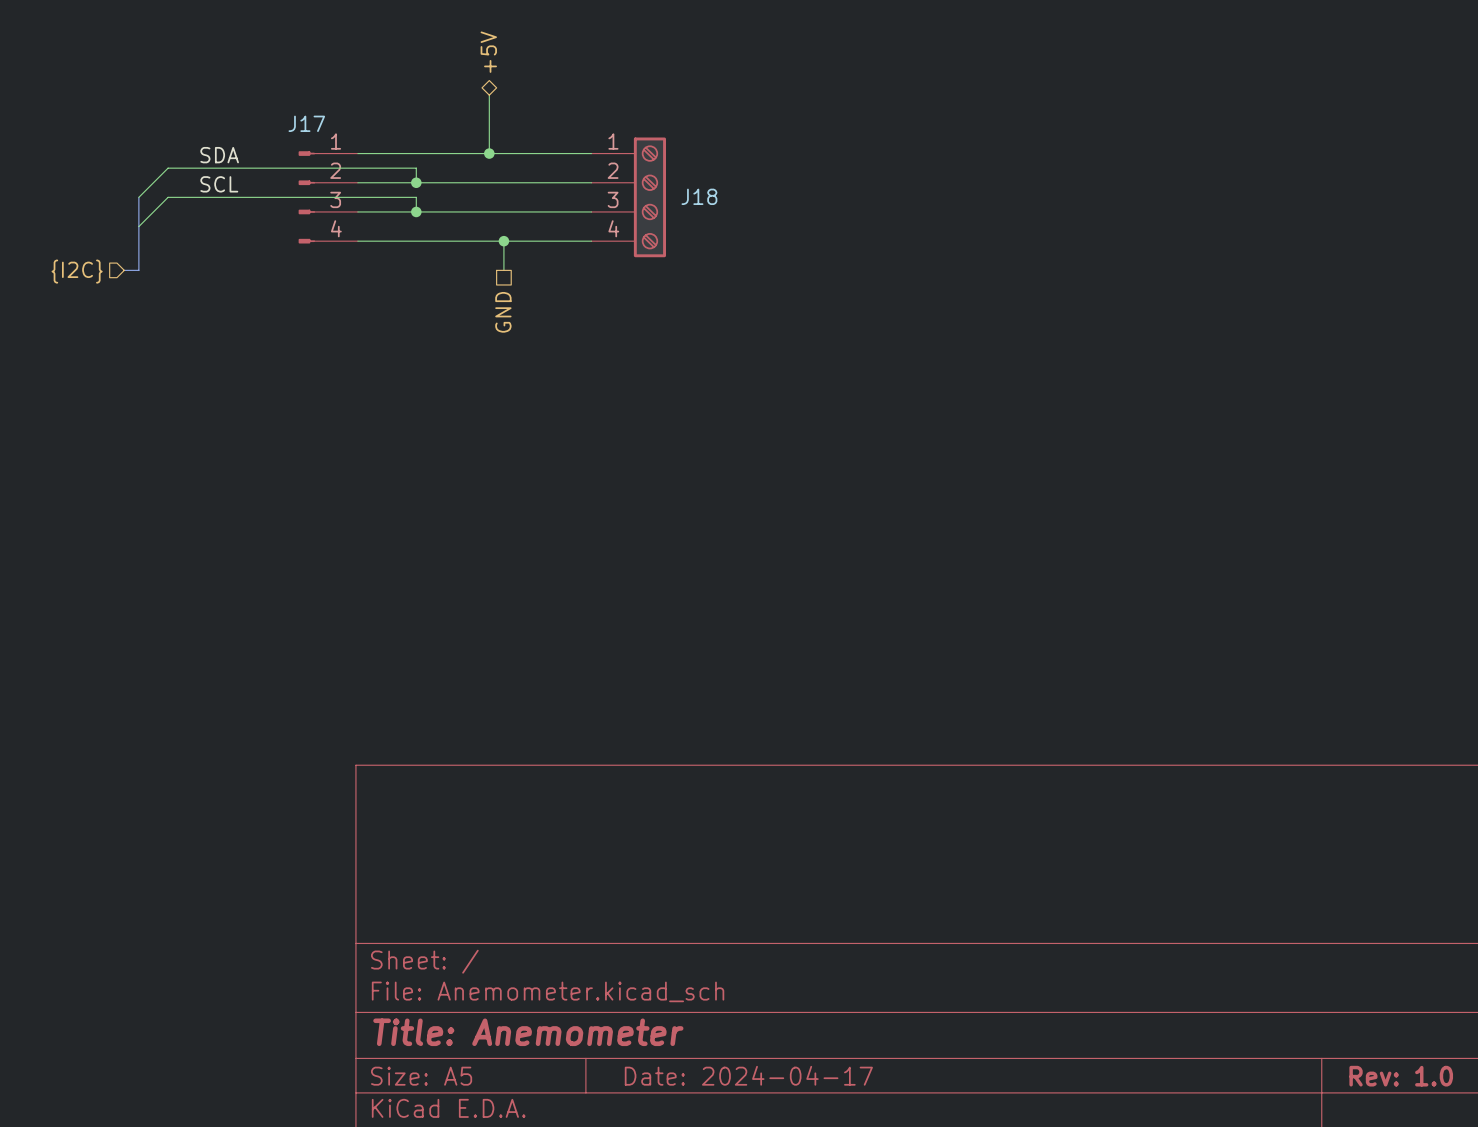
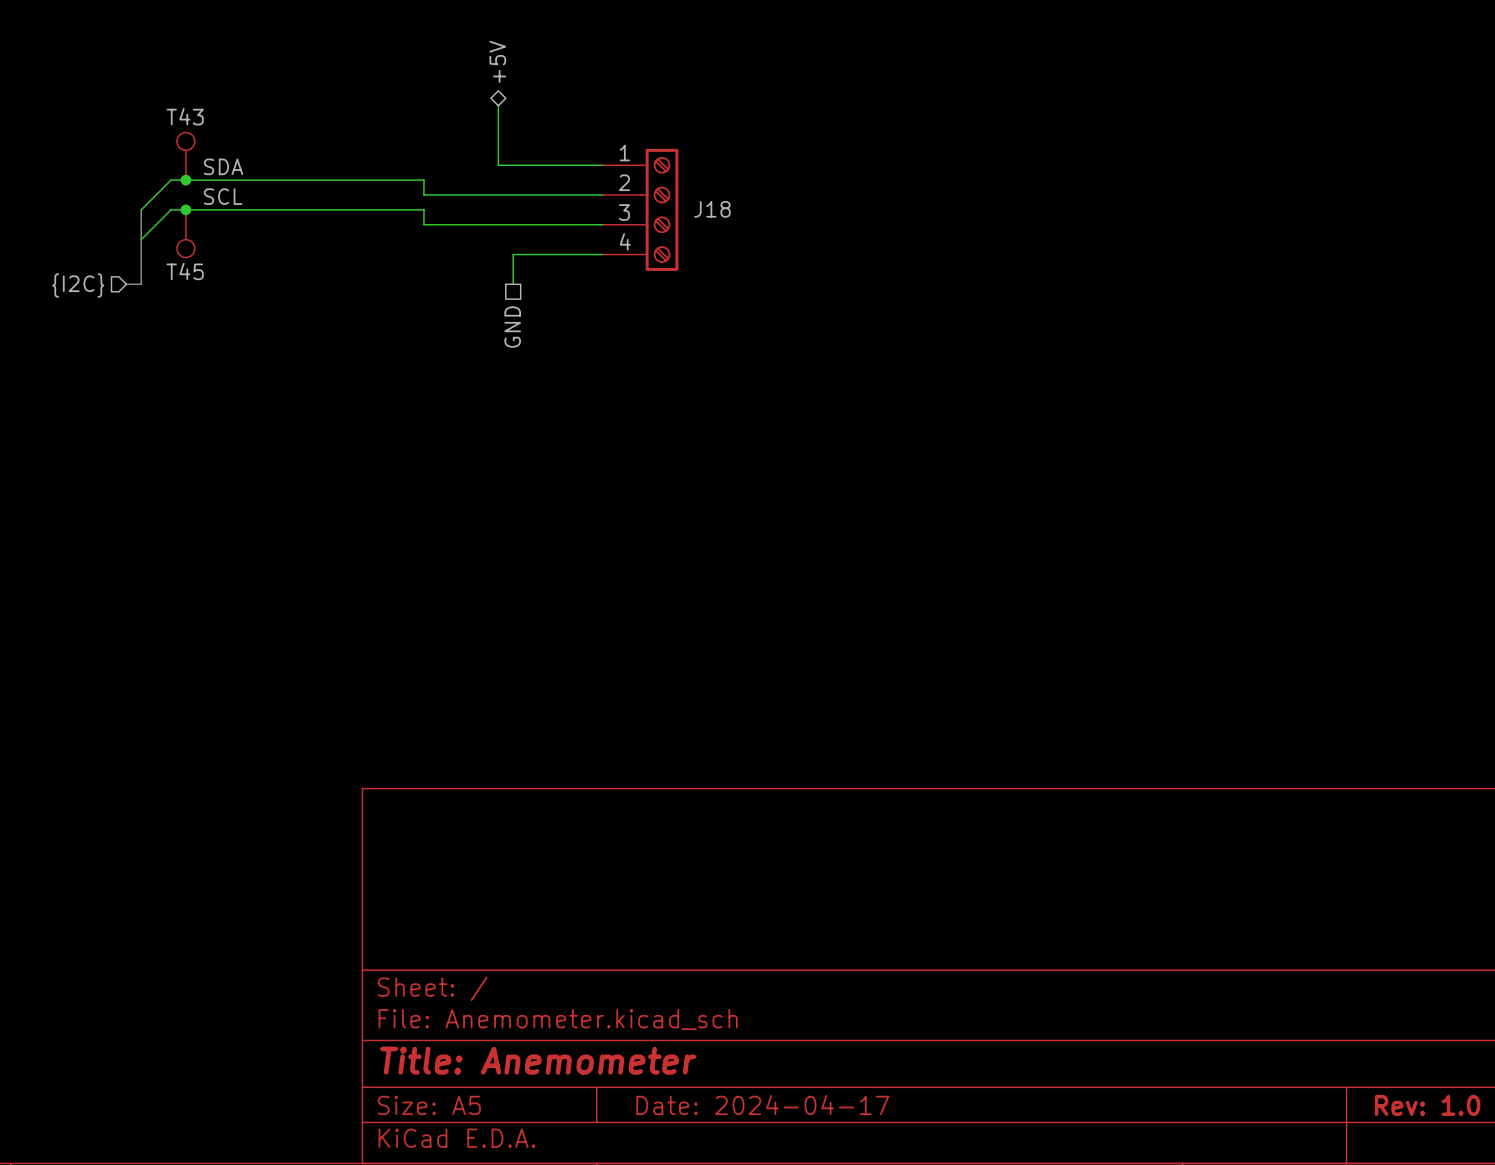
T43: none -> (185, 156)
wire: (357, 153) (489, 153) -> none
junction: (489, 153) -> none
junction: none -> (185, 180)
wire: (357, 182) (416, 182) -> none
junction: (416, 182) -> none
junction: none -> (185, 209)
J17: (328, 197) -> none
wire: (357, 211) (416, 211) -> none
junction: (416, 211) -> none
T45: none -> (185, 233)
wire: (357, 241) (503, 241) -> none
junction: (503, 241) -> none

